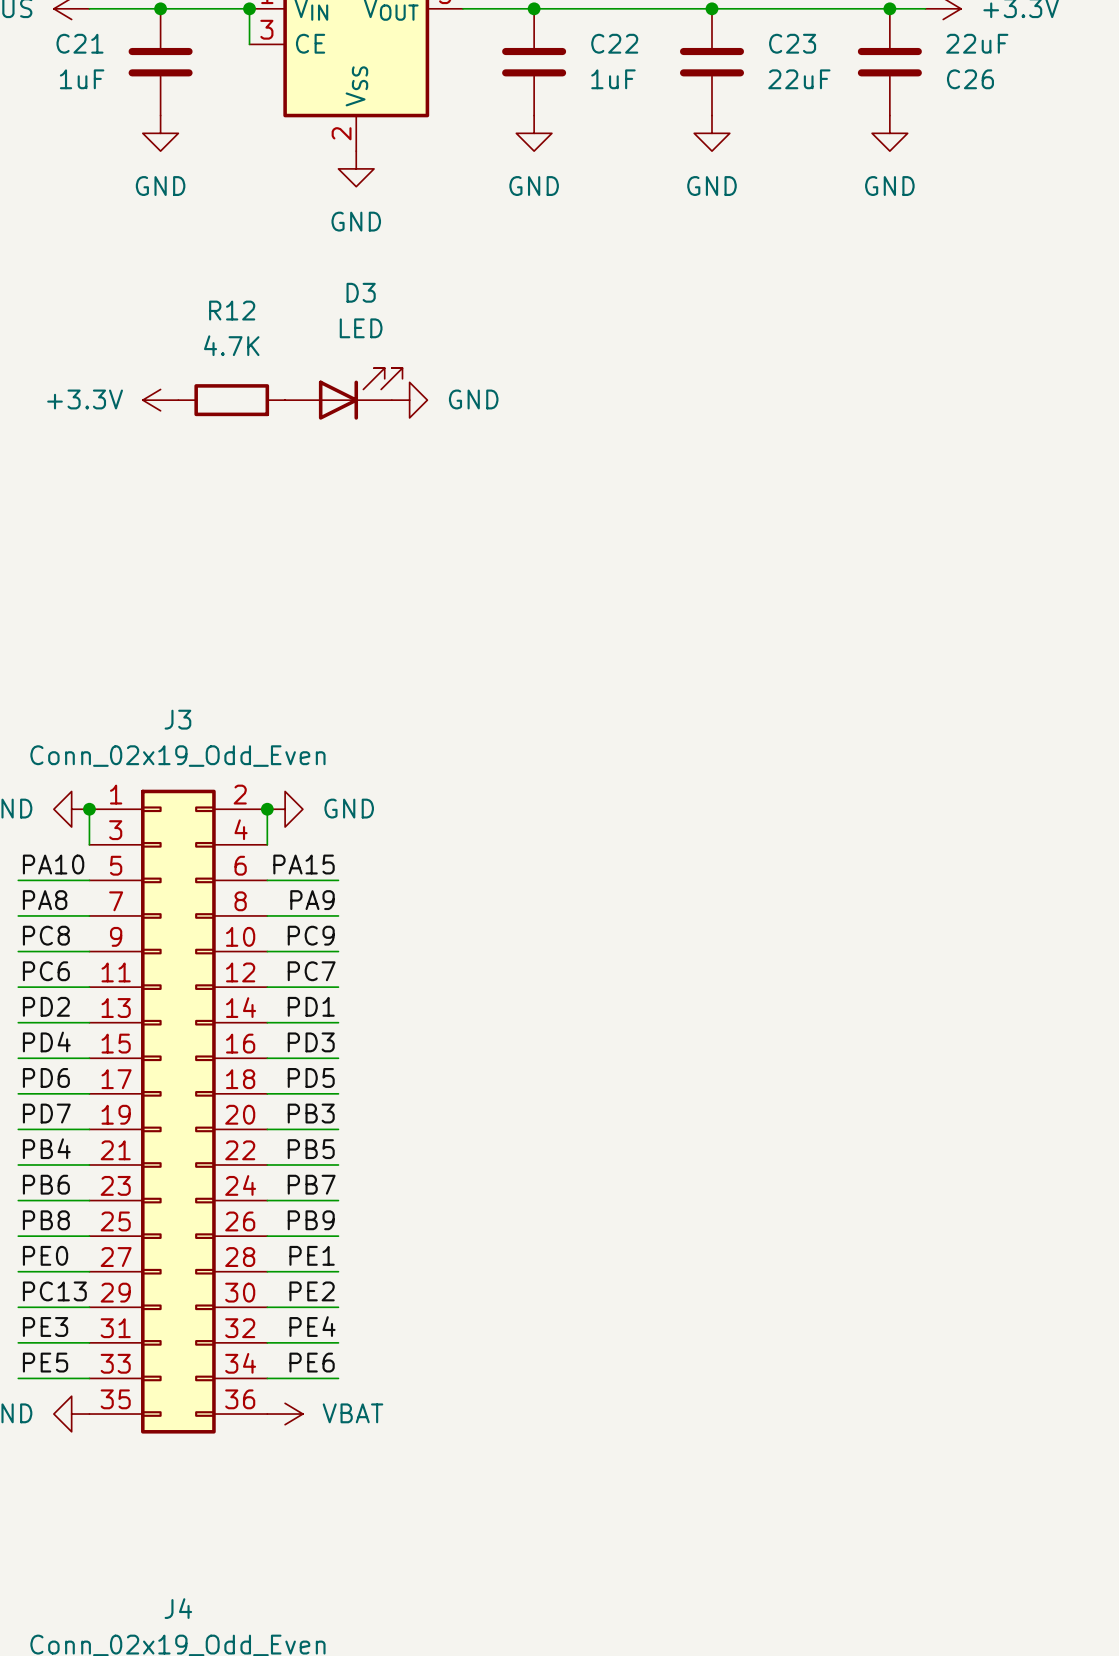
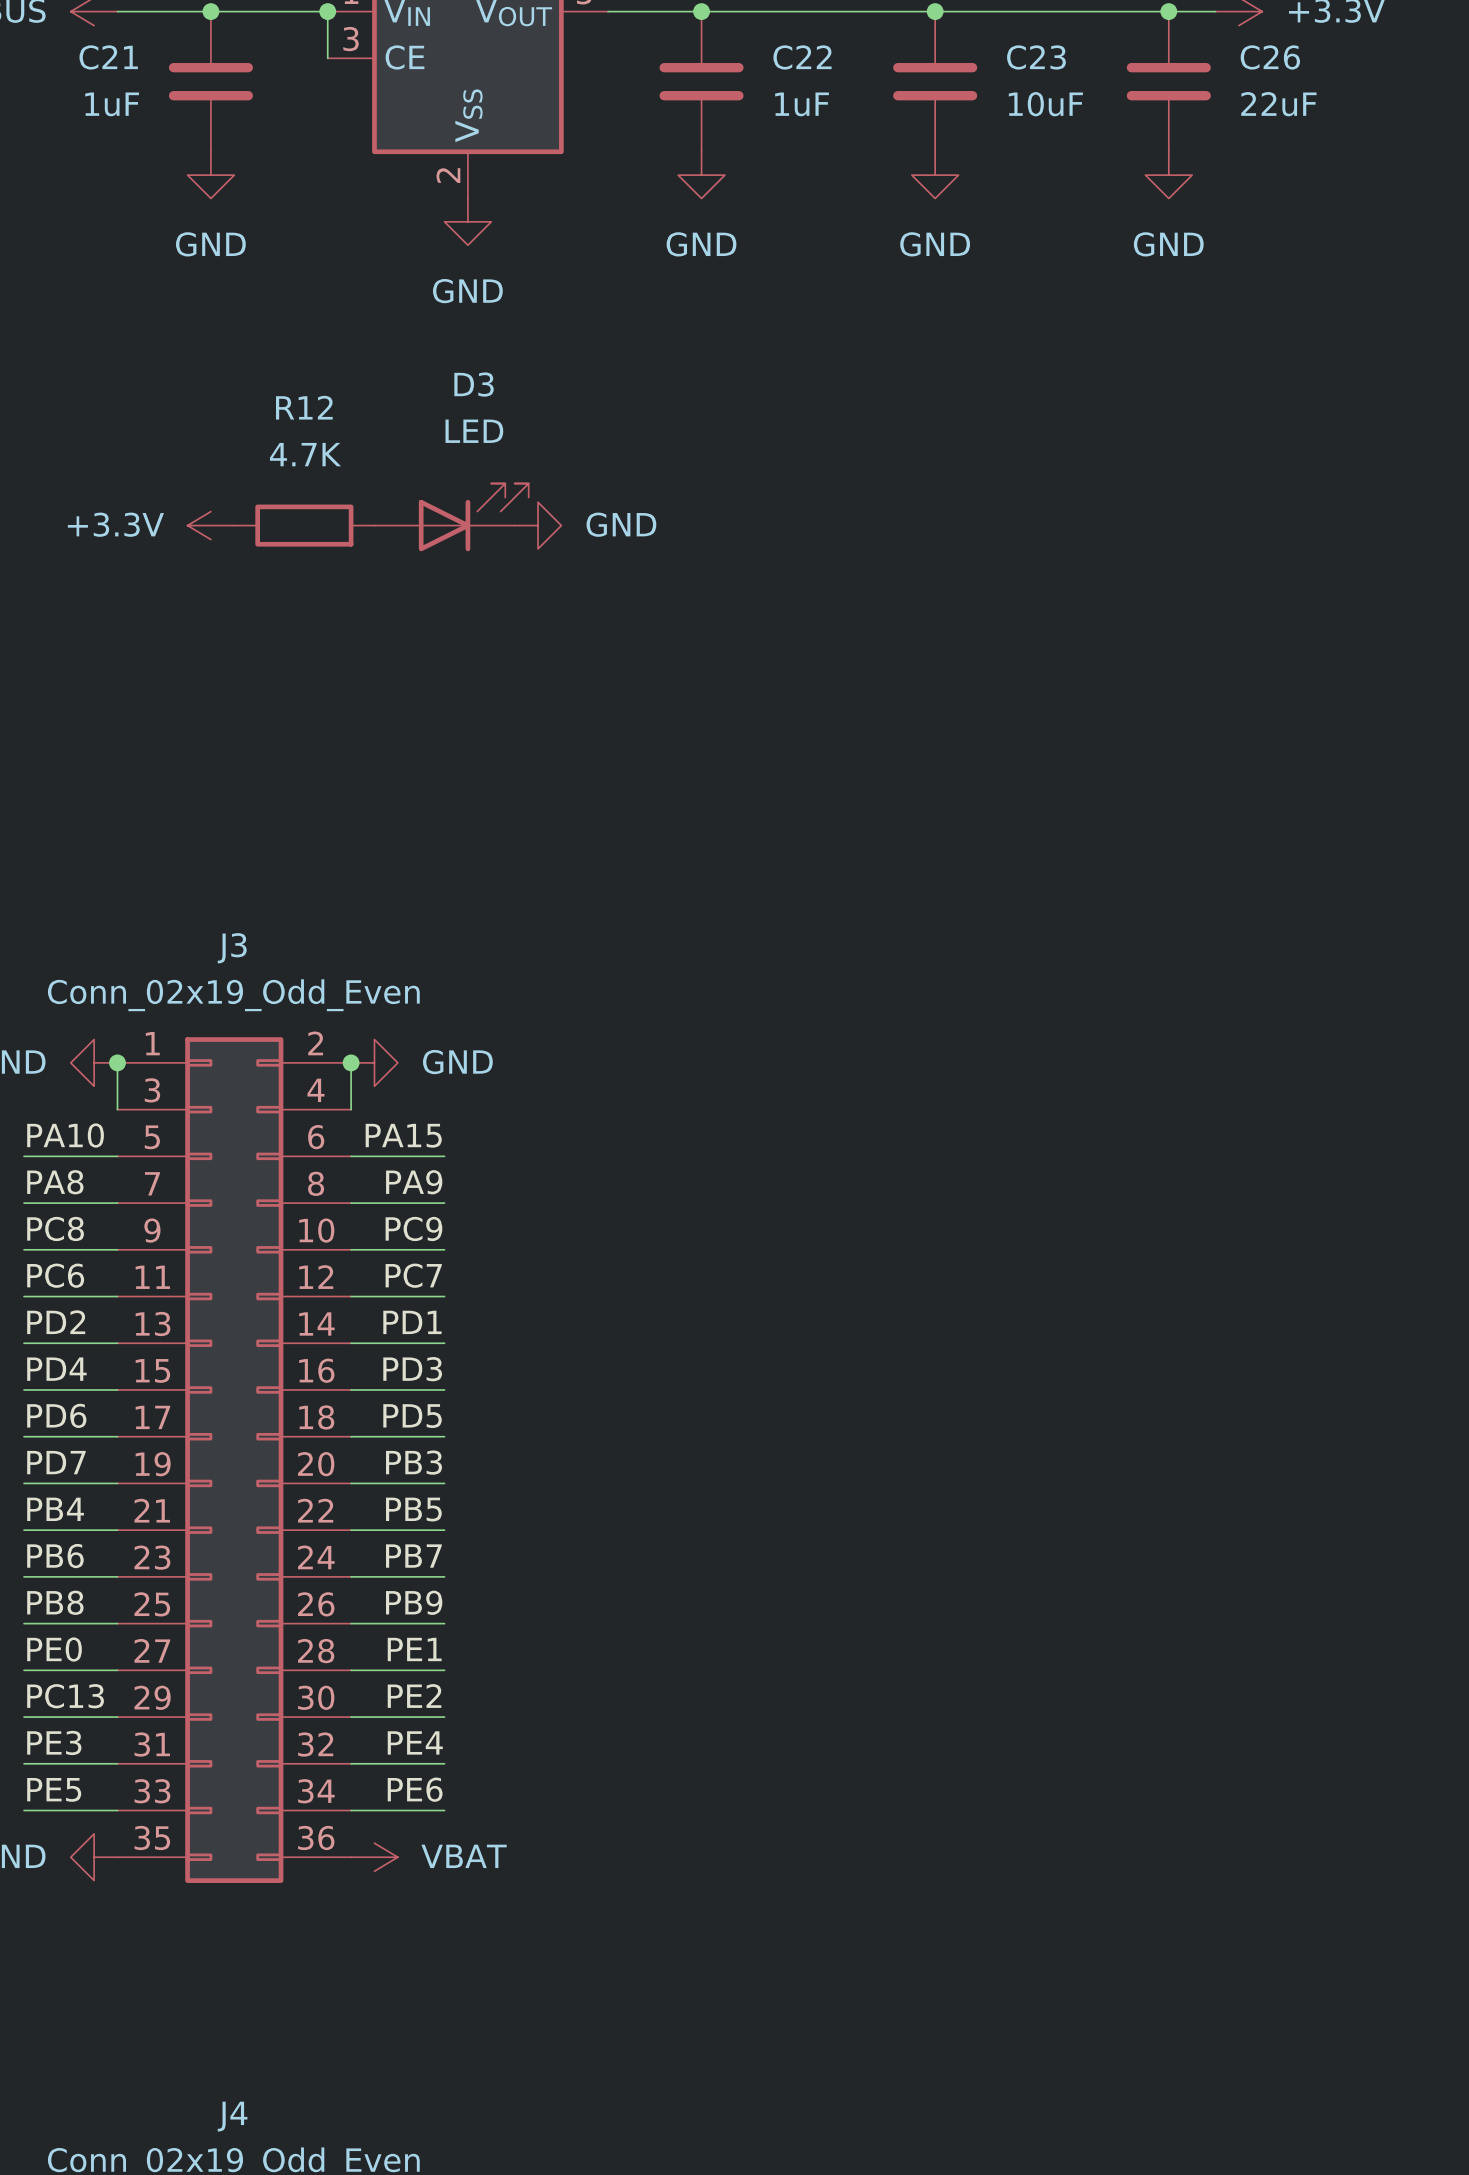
C26 value position: 22uF (977, 43) -> 22uF (1278, 104)
C23 value: 22uF (799, 79) -> 10uF (1045, 104)
C26 name position: C26 (970, 79) -> C26 (1270, 57)

